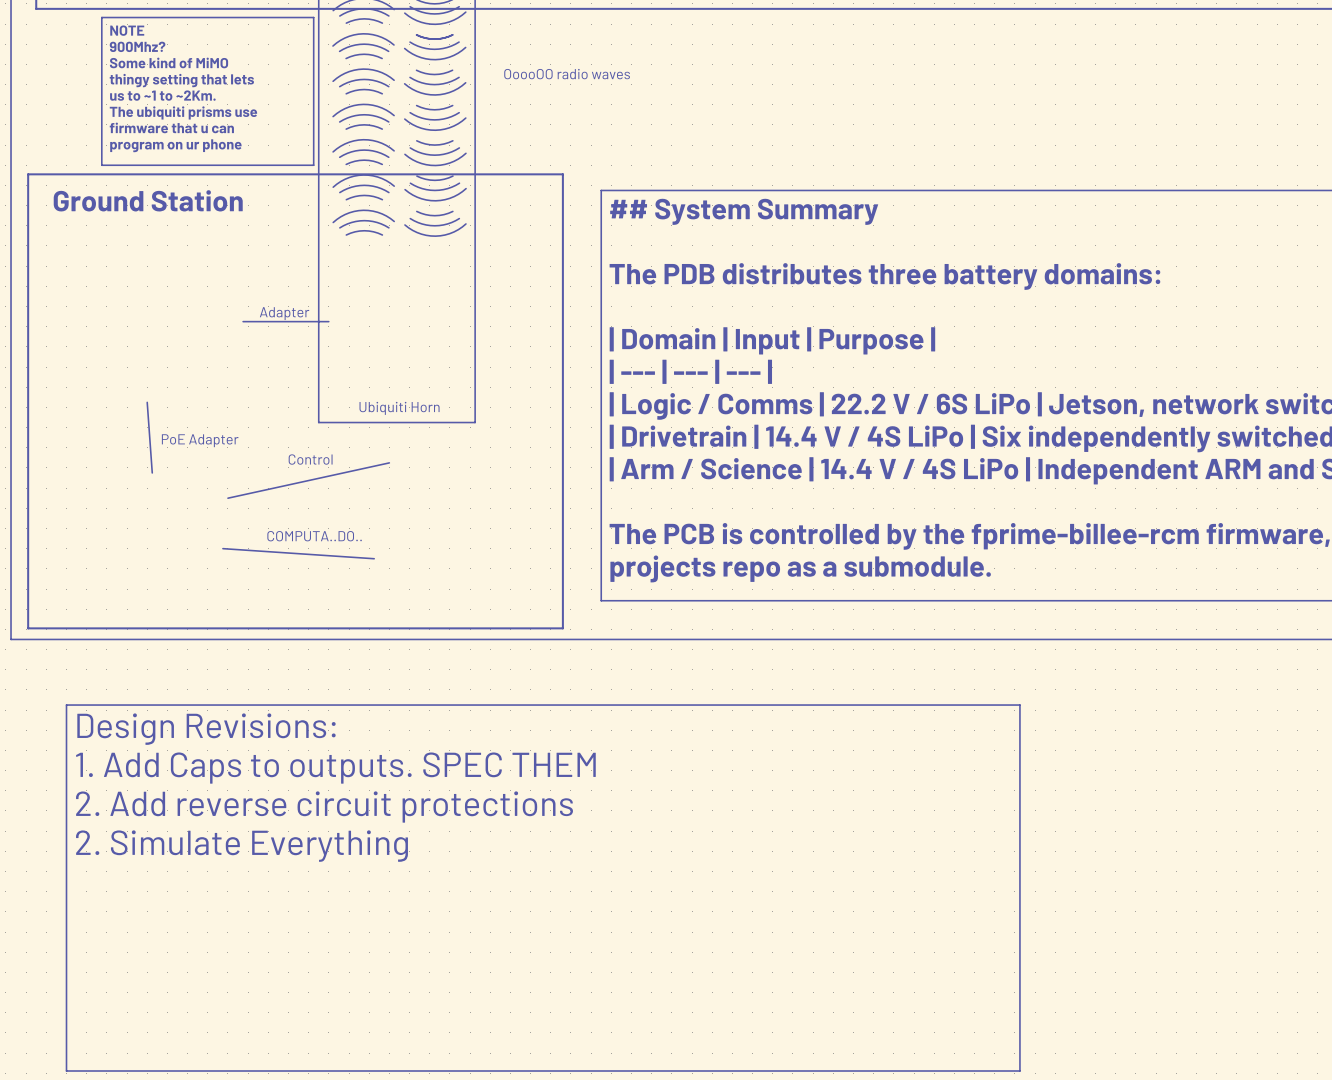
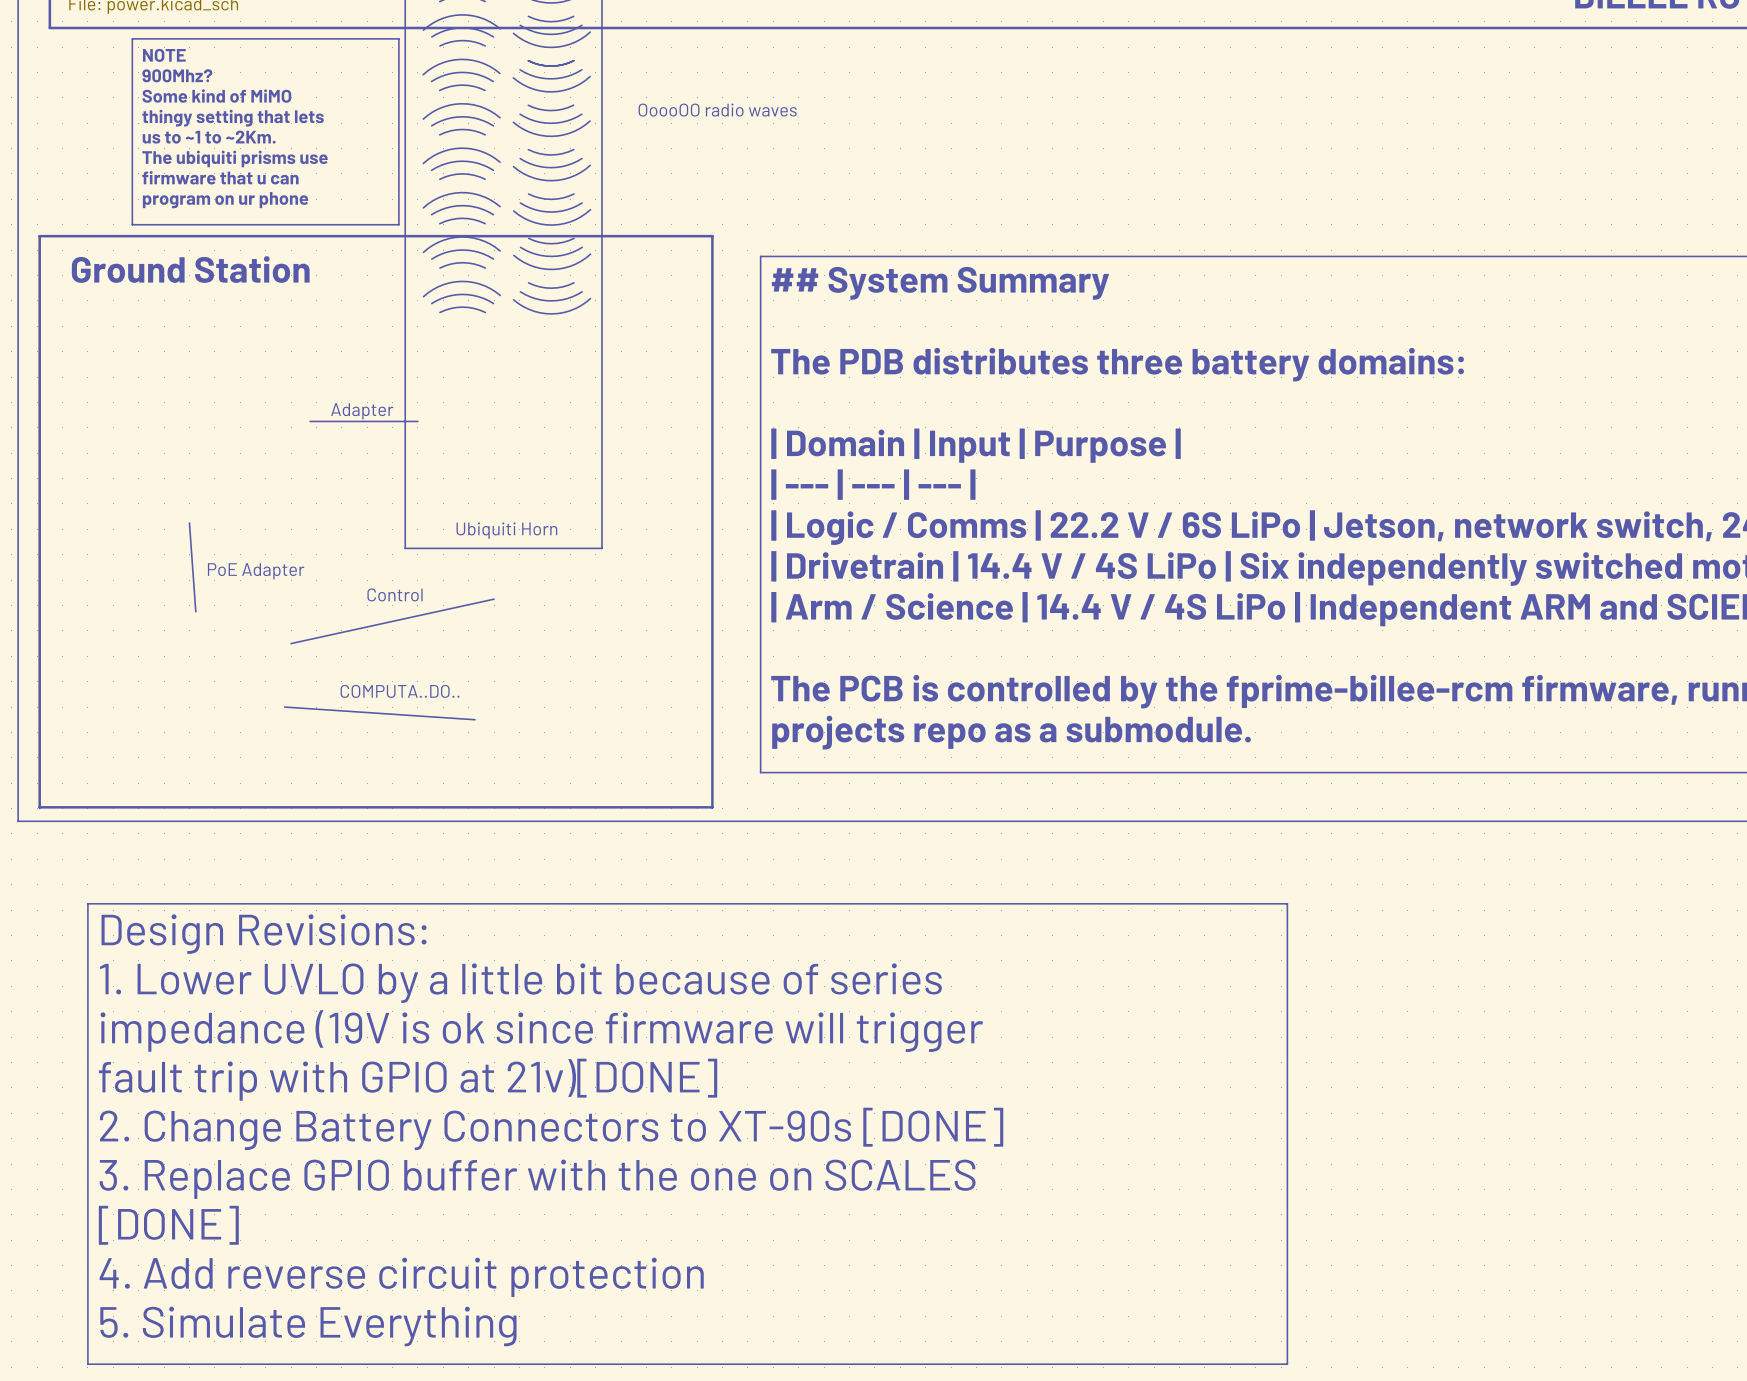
text: 1. Add Caps to outputs. SPEC THEM (335, 768) -> 1. Lower UVLO by a little bit because of series (520, 983)
text: 2. Add reverse circuit protections (324, 807) -> impedance (19V is ok since firmware will trigger (541, 1031)
text: 2. Simulate Everything (241, 846) -> fault trip with GPIO at 21v)[DONE] (408, 1079)
text: none -> 2. Change Battery Connectors to XT-90s [DONE] (551, 1128)
text: none -> 3. Replace GPIO buffer with the one on SCALES (537, 1179)
text: none -> [DONE] (168, 1225)
text: none -> 4. Add reverse circuit protection (401, 1277)
text: none -> 5. Simulate Everything (308, 1326)

